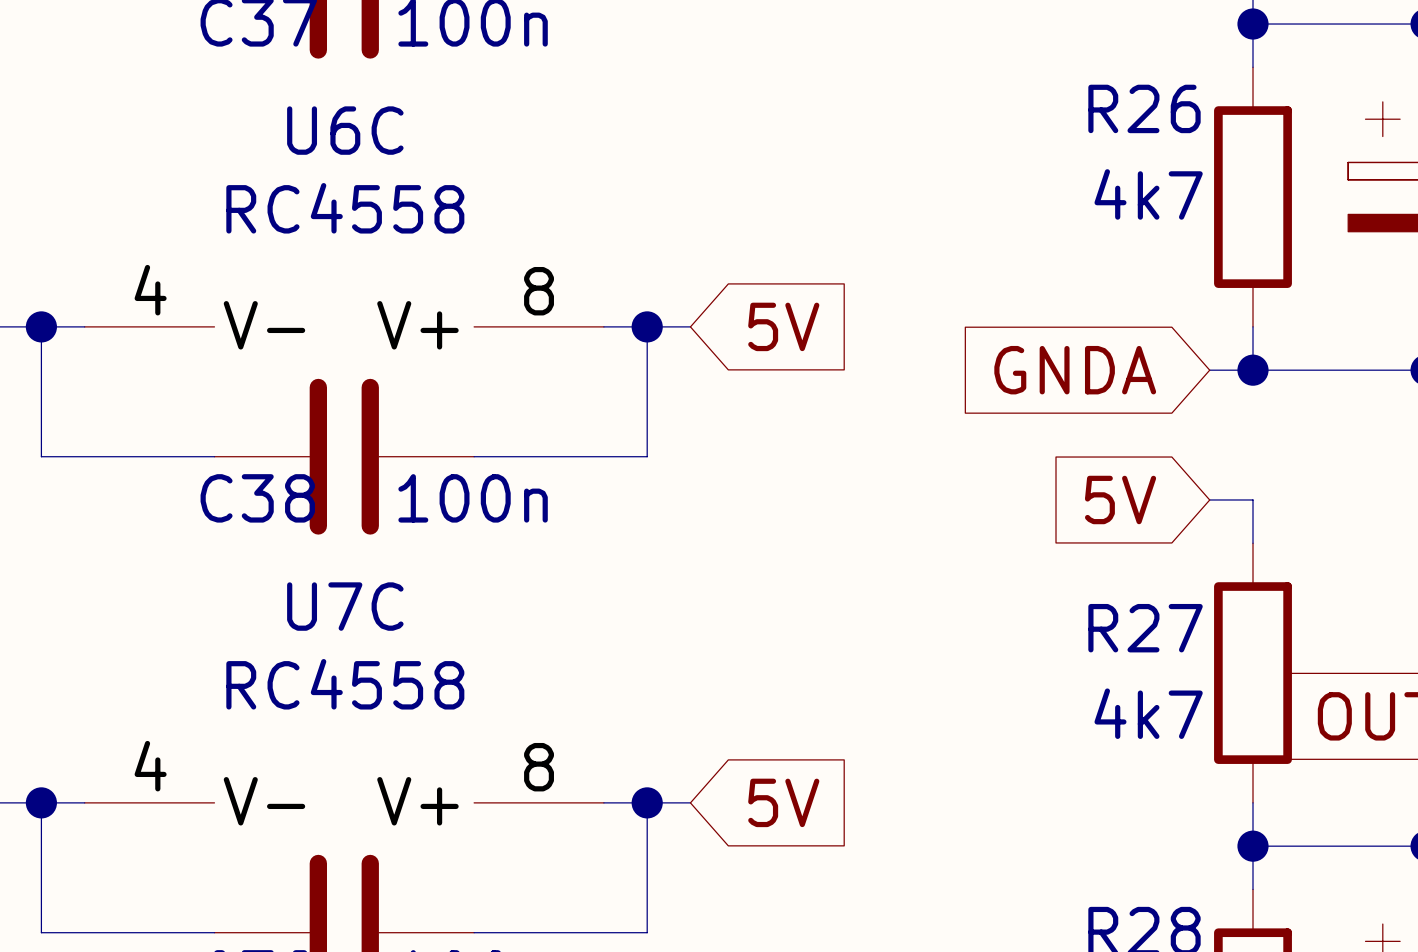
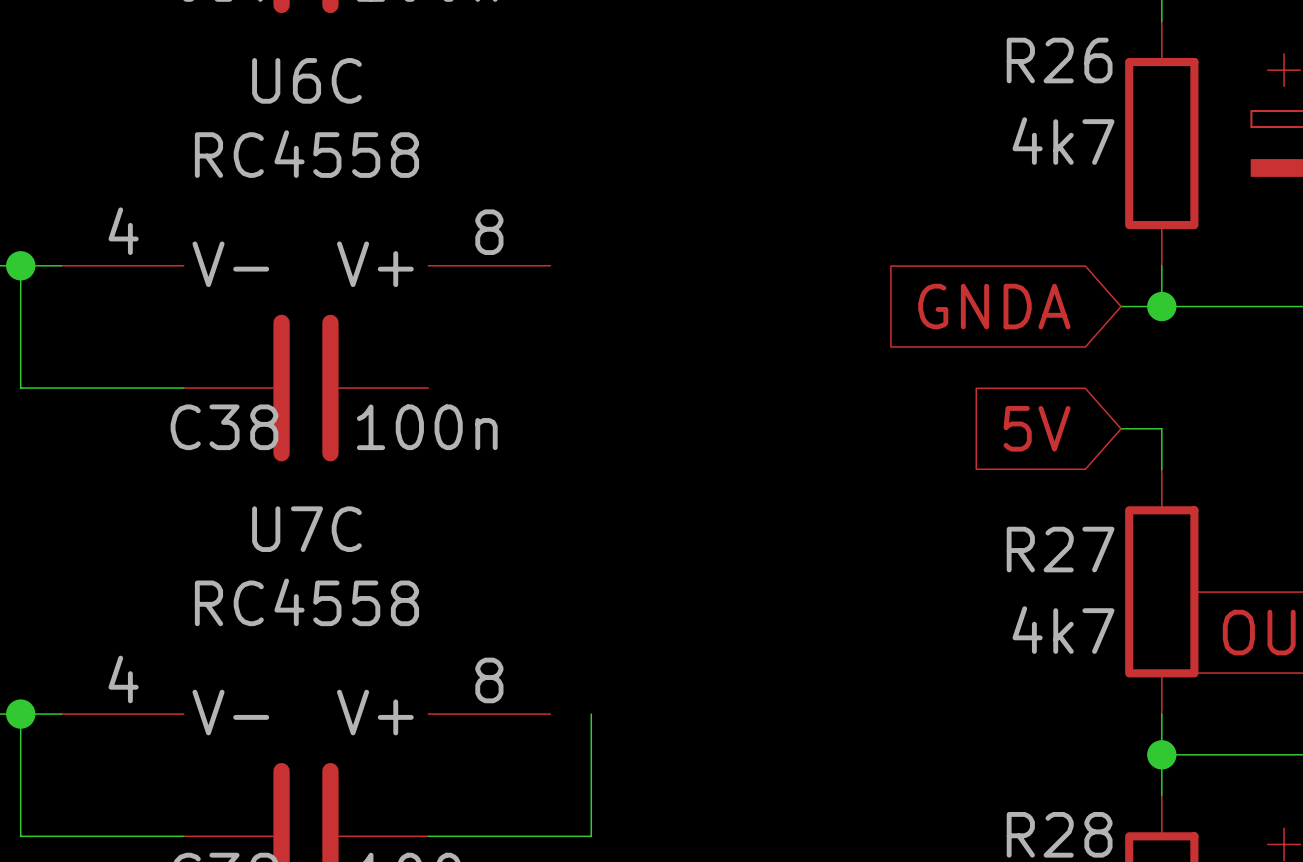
wire: (603, 326) (690, 326) -> none
wire: (647, 326) (647, 456) (474, 456) -> none
junction: (647, 326) -> none
global label: 5V (783, 326) -> none
wire: (603, 802) (690, 802) -> none
junction: (647, 802) -> none
global label: 5V (783, 802) -> none

